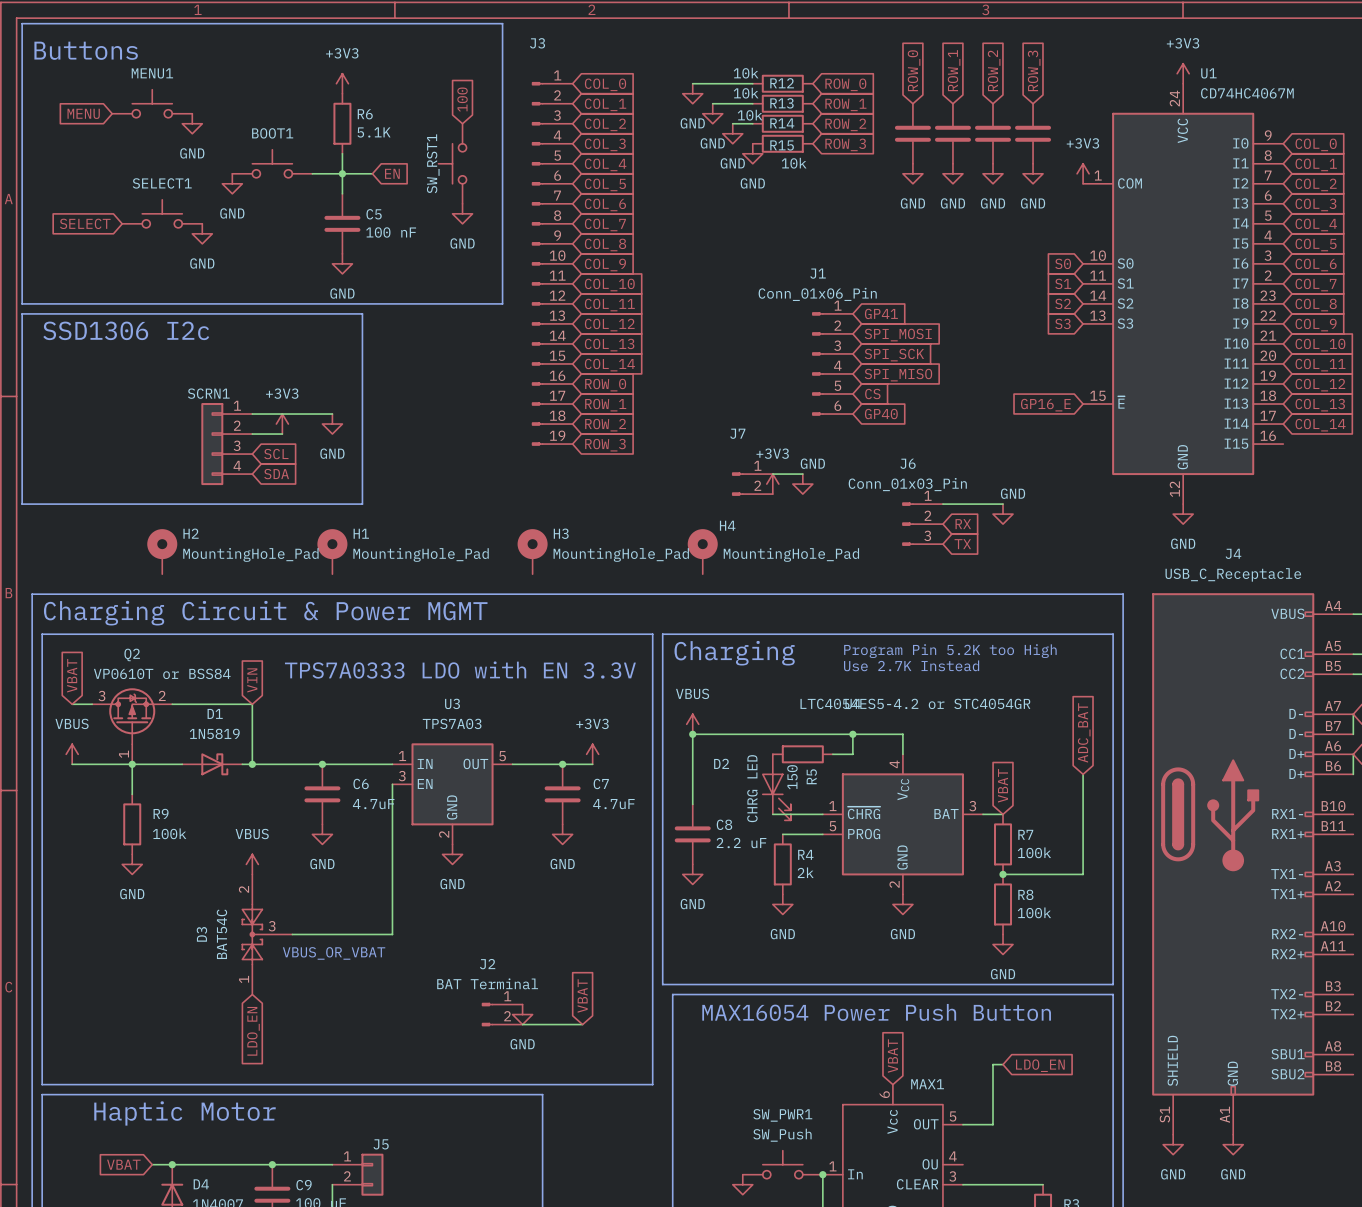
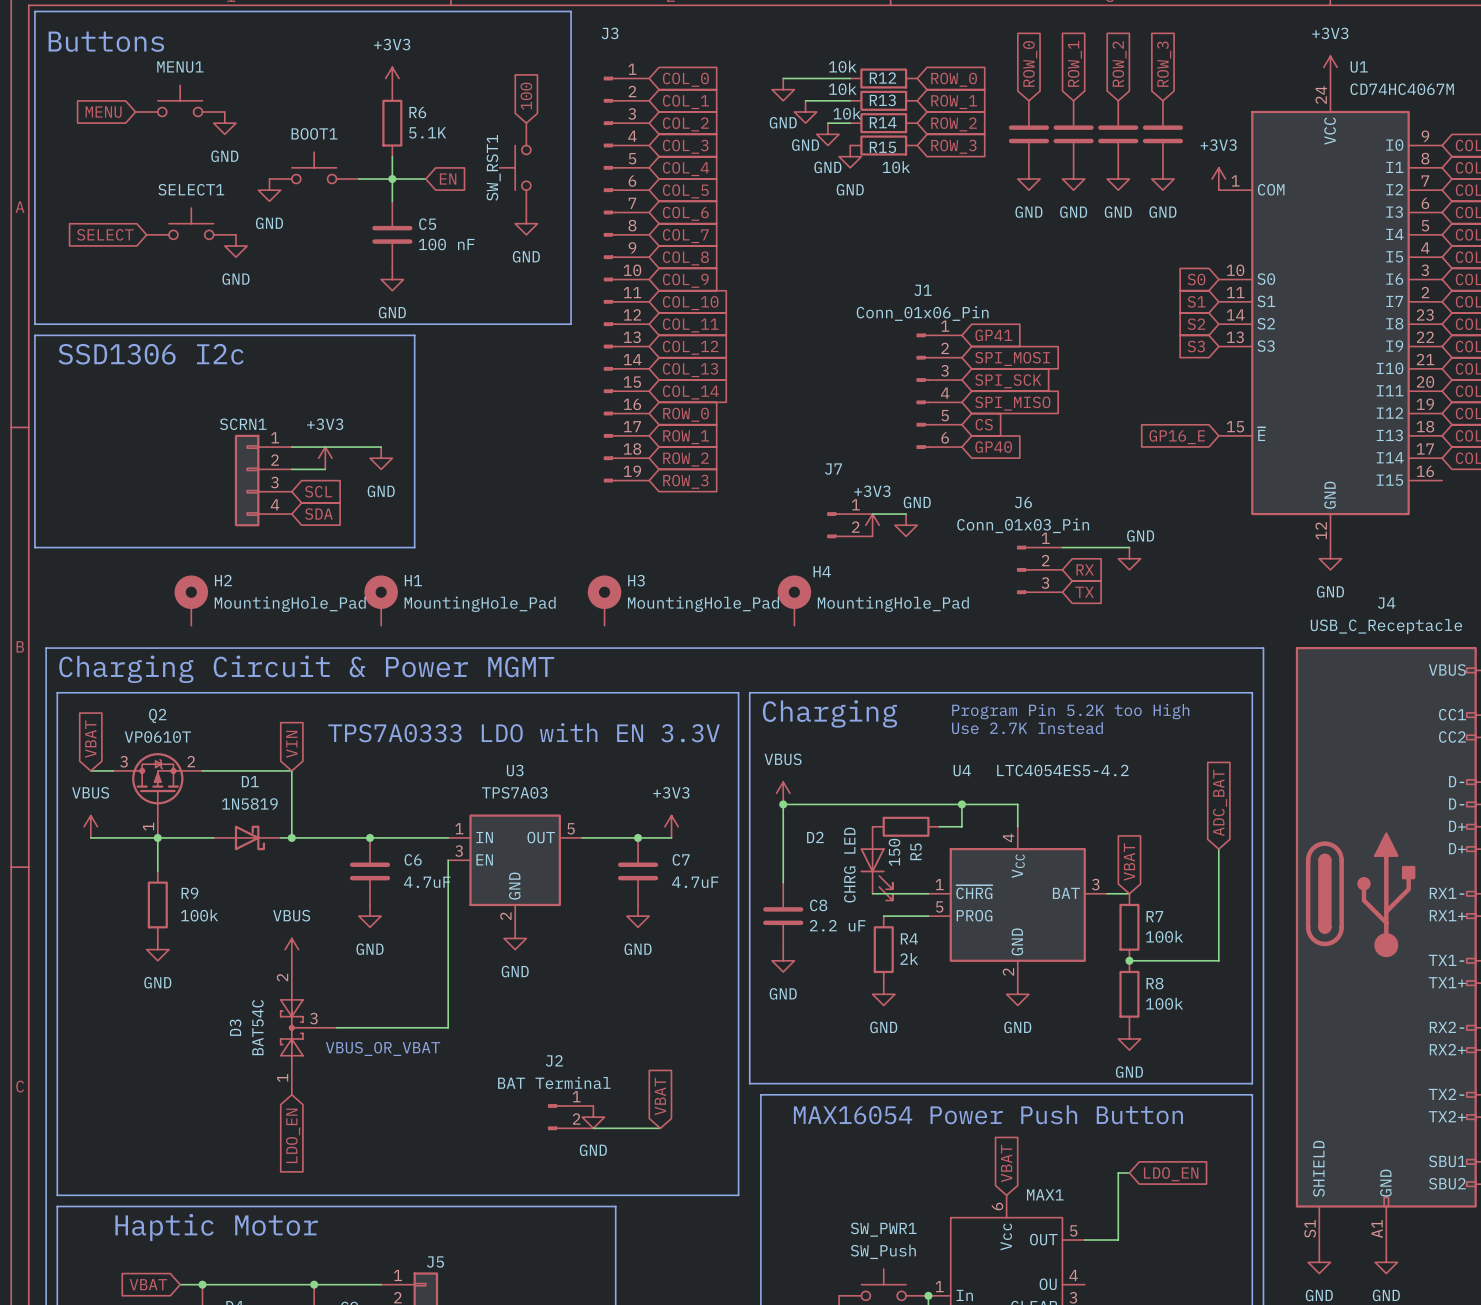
Q2 value: VP0610T or BSS84 (162, 673) -> VP0610T (157, 737)
U4 value: LTC4054ES5-4.2 or STC4054GR (915, 703) -> LTC4054ES5-4.2 (1062, 770)

